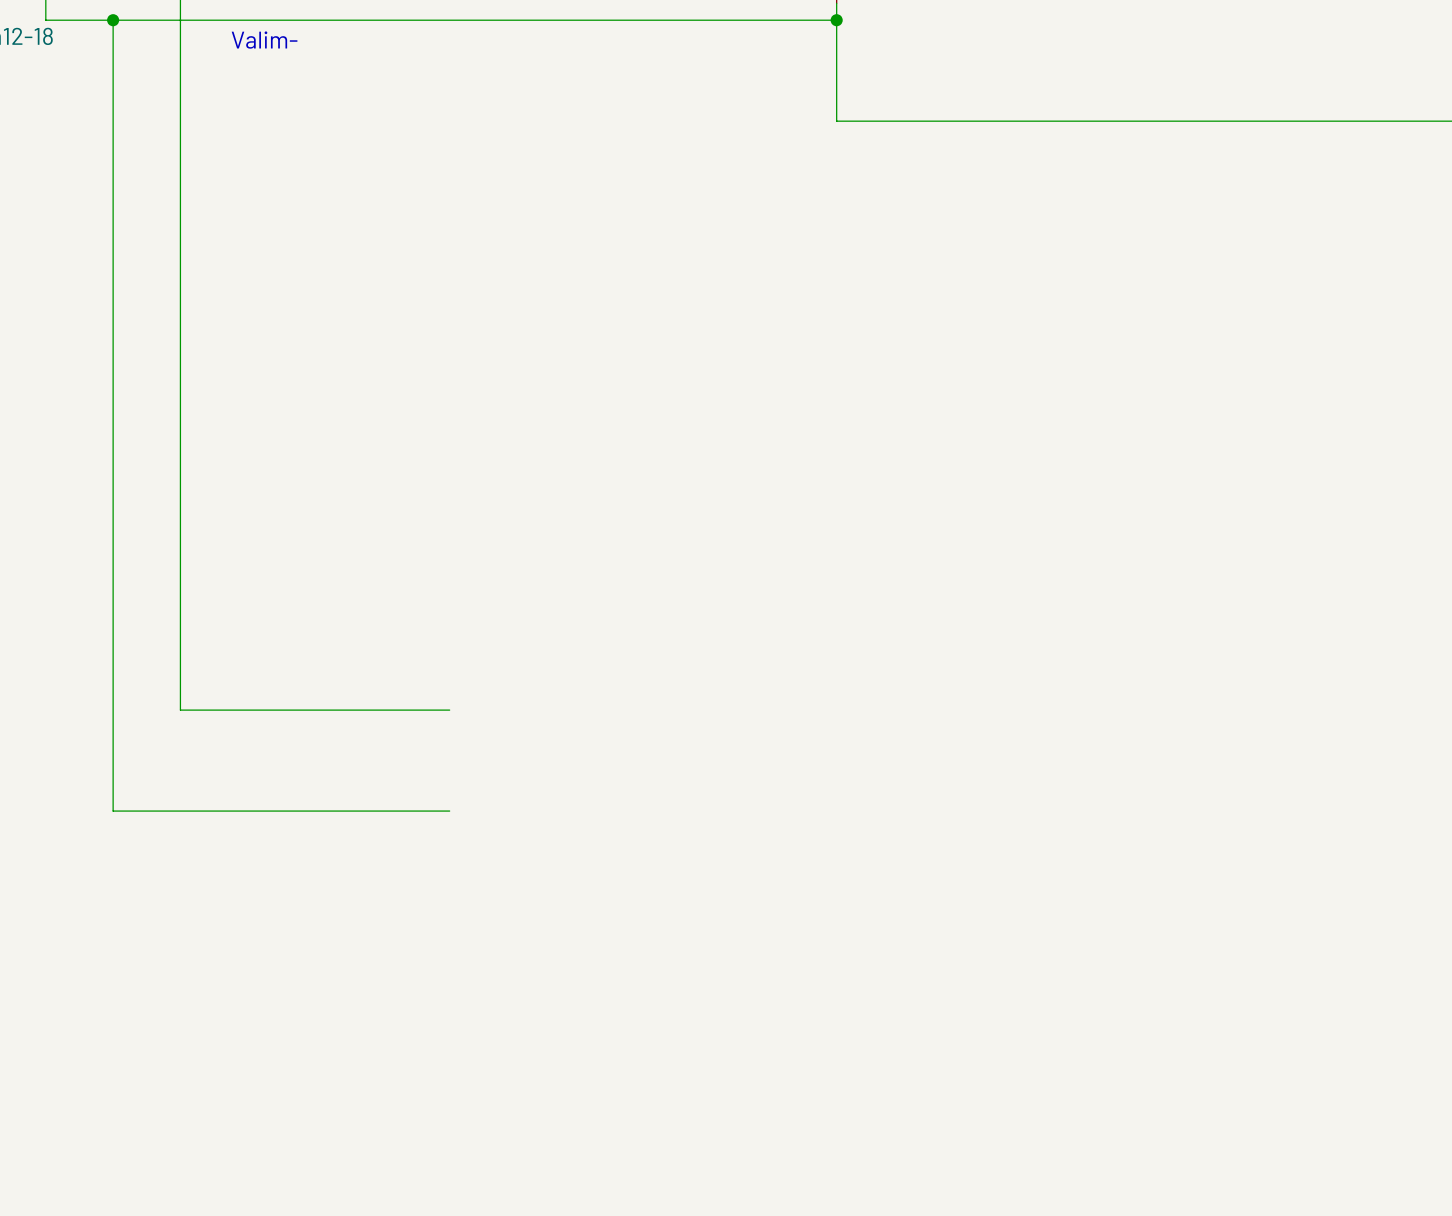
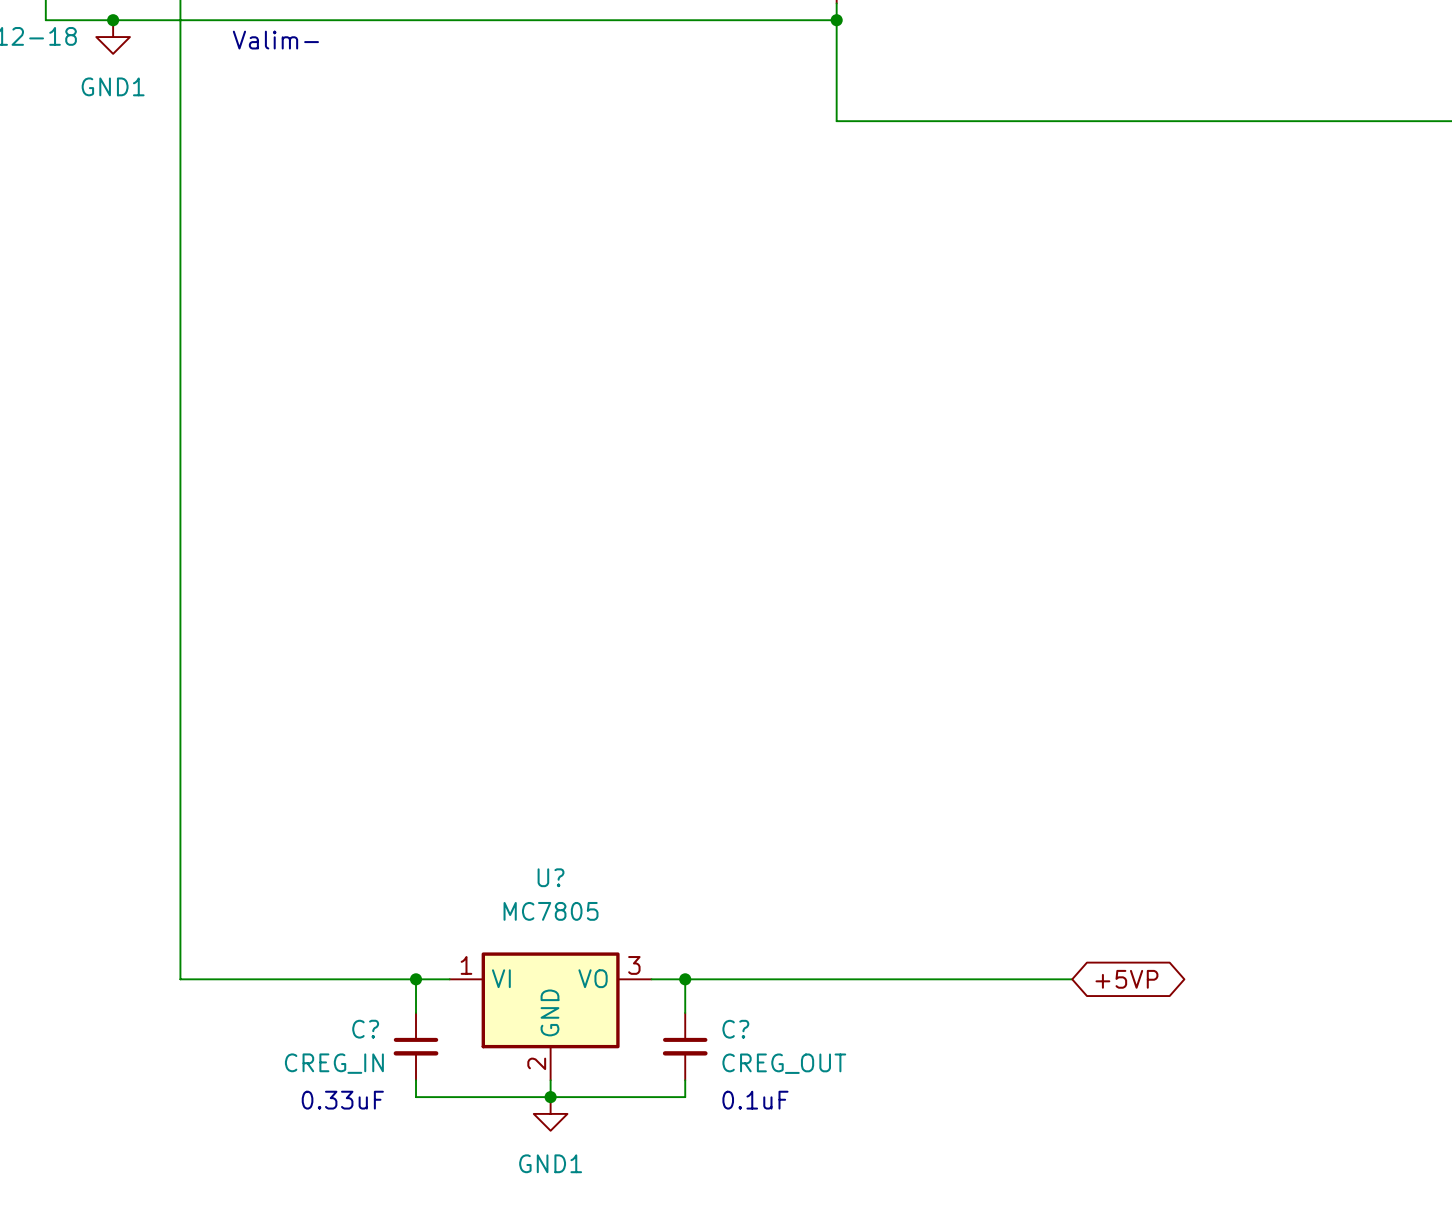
wire: (113, 20) (113, 811) (449, 811) -> none
power symbol: none -> GND1 (113, 37)
wire: (180, 710) (449, 710) -> (180, 710) (180, 979) (449, 979)
wire: none -> (416, 979) (416, 1012)
junction: none -> (416, 979)
wire: none -> (651, 979) (1072, 979)
wire: none -> (685, 979) (685, 1012)
junction: none -> (685, 979)
global label: none -> +5VP (1126, 979)
U?: none -> MC7805 (550, 1016)
C?: none -> CREG_IN (416, 1046)
C?: none -> CREG_OUT (685, 1046)
wire: none -> (416, 1080) (416, 1097) (685, 1097) (685, 1080)
wire: none -> (550, 1080) (550, 1097)
junction: none -> (550, 1097)
text: none -> 0.33uF (342, 1100)
text: none -> 0.1uF (755, 1100)
power symbol: none -> GND1 (550, 1113)

